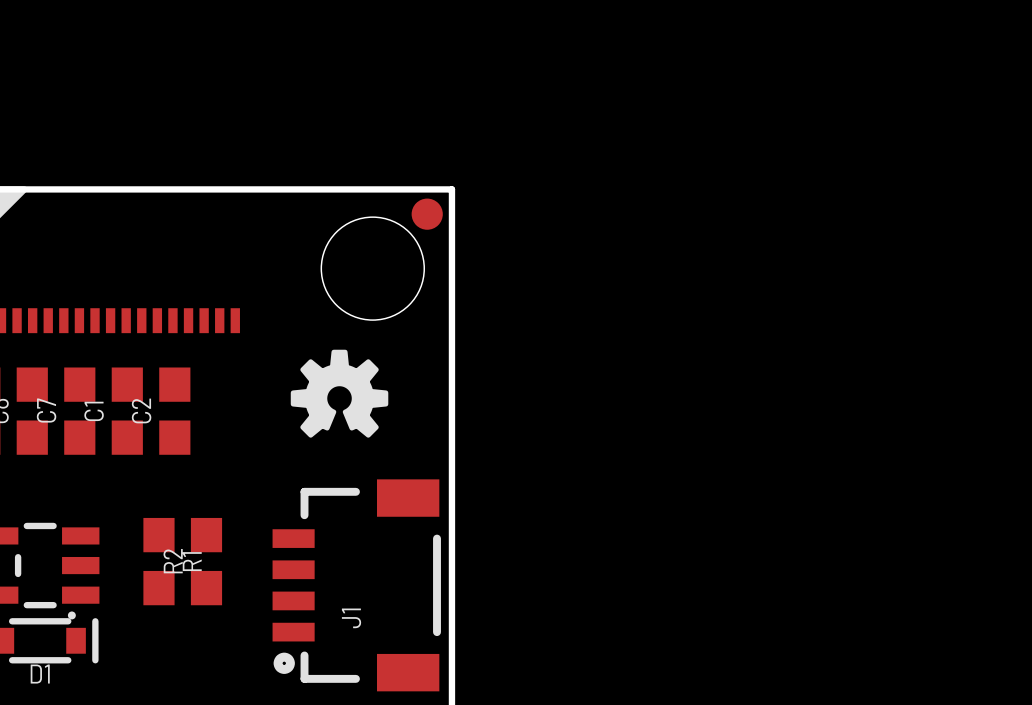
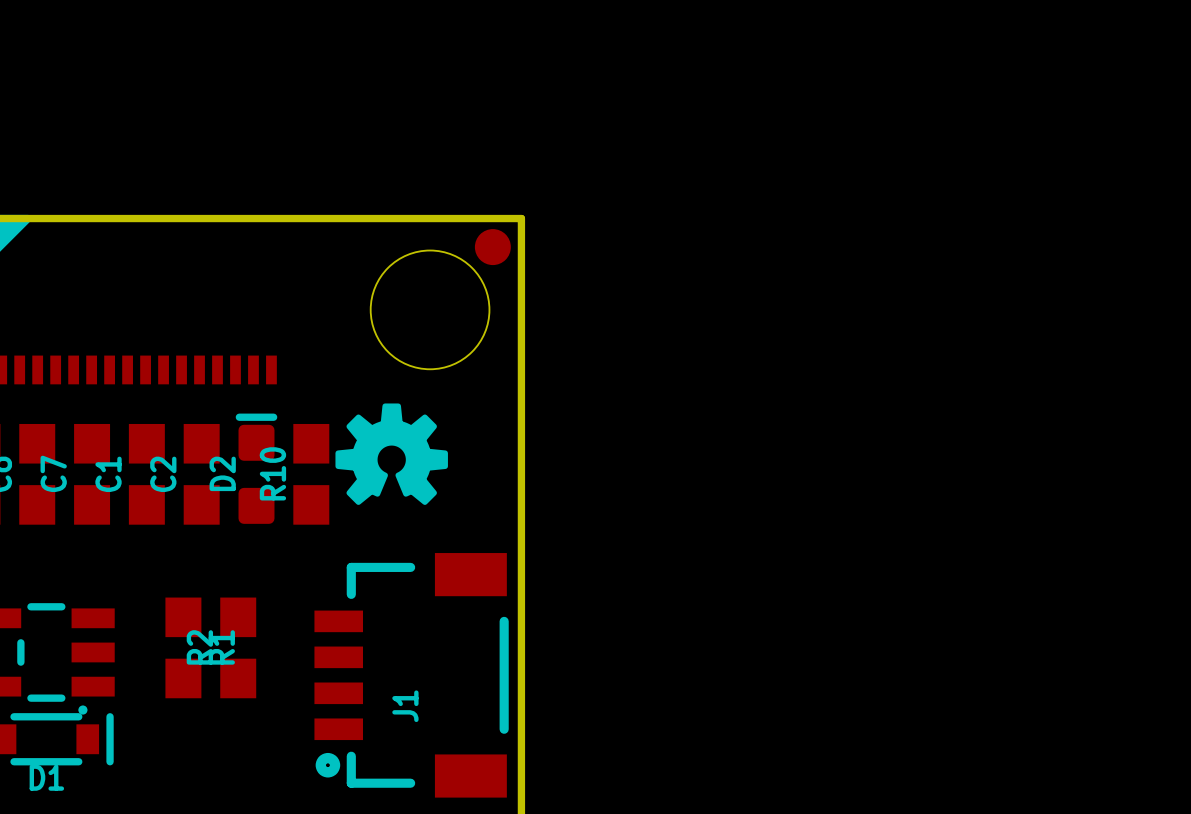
D2: none -> (256, 468)
R10: none -> (311, 474)

